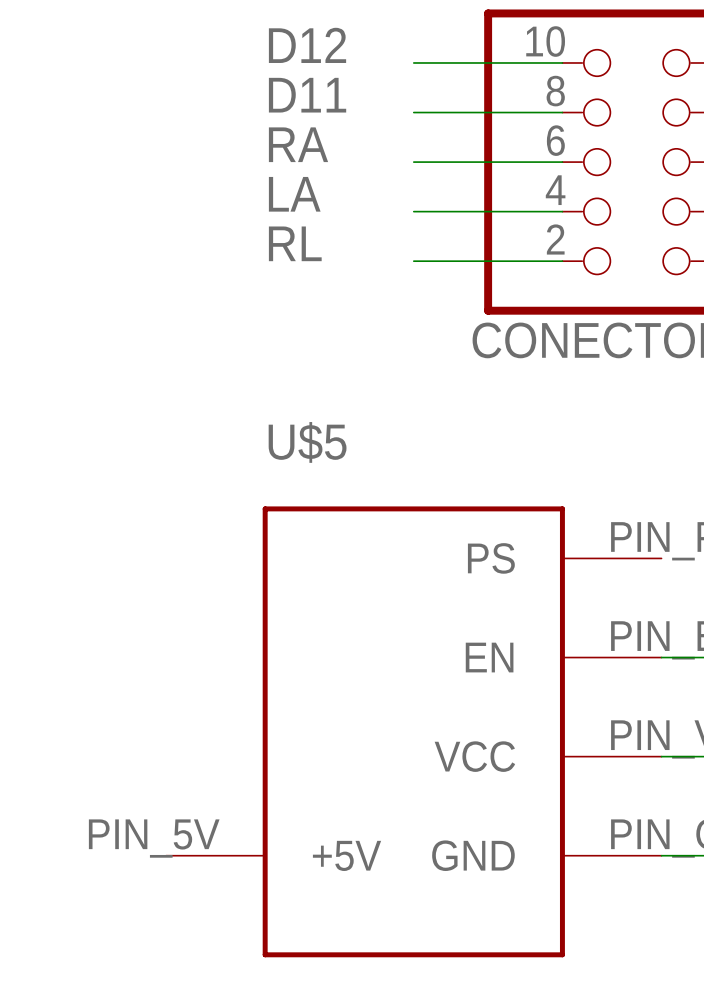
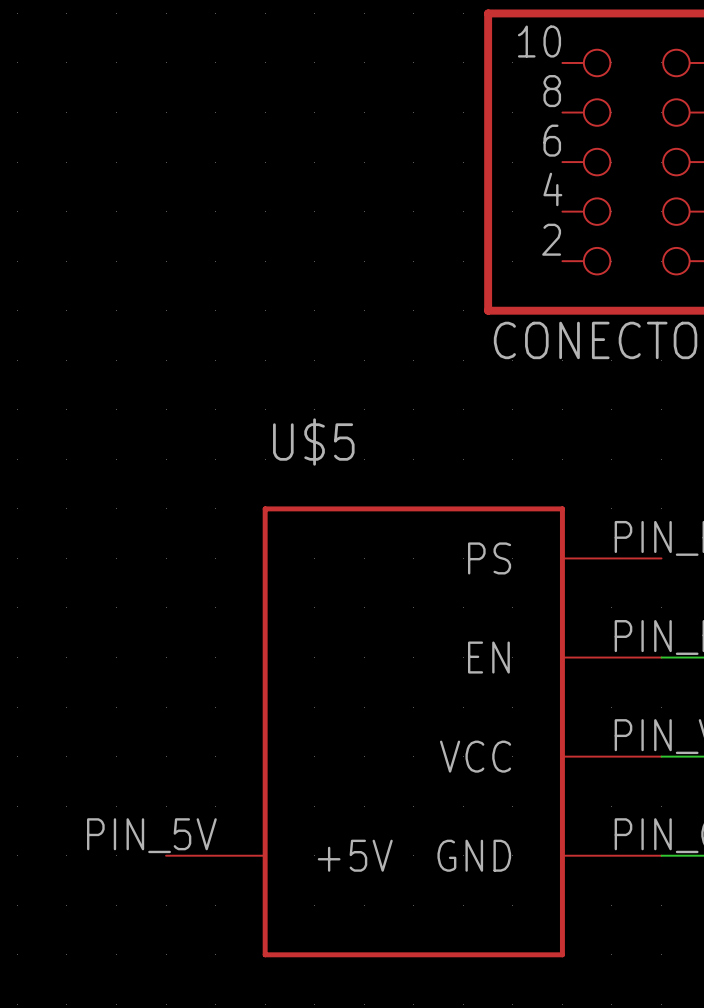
label: D12 (307, 45) -> none
wire: (413, 62) (562, 62) -> none
label: D11 (307, 95) -> none
wire: (413, 112) (562, 112) -> none
label: RA (298, 144) -> none
wire: (413, 162) (562, 162) -> none
label: LA (294, 194) -> none
wire: (413, 211) (562, 211) -> none
label: RL (295, 243) -> none
wire: (413, 261) (562, 261) -> none

